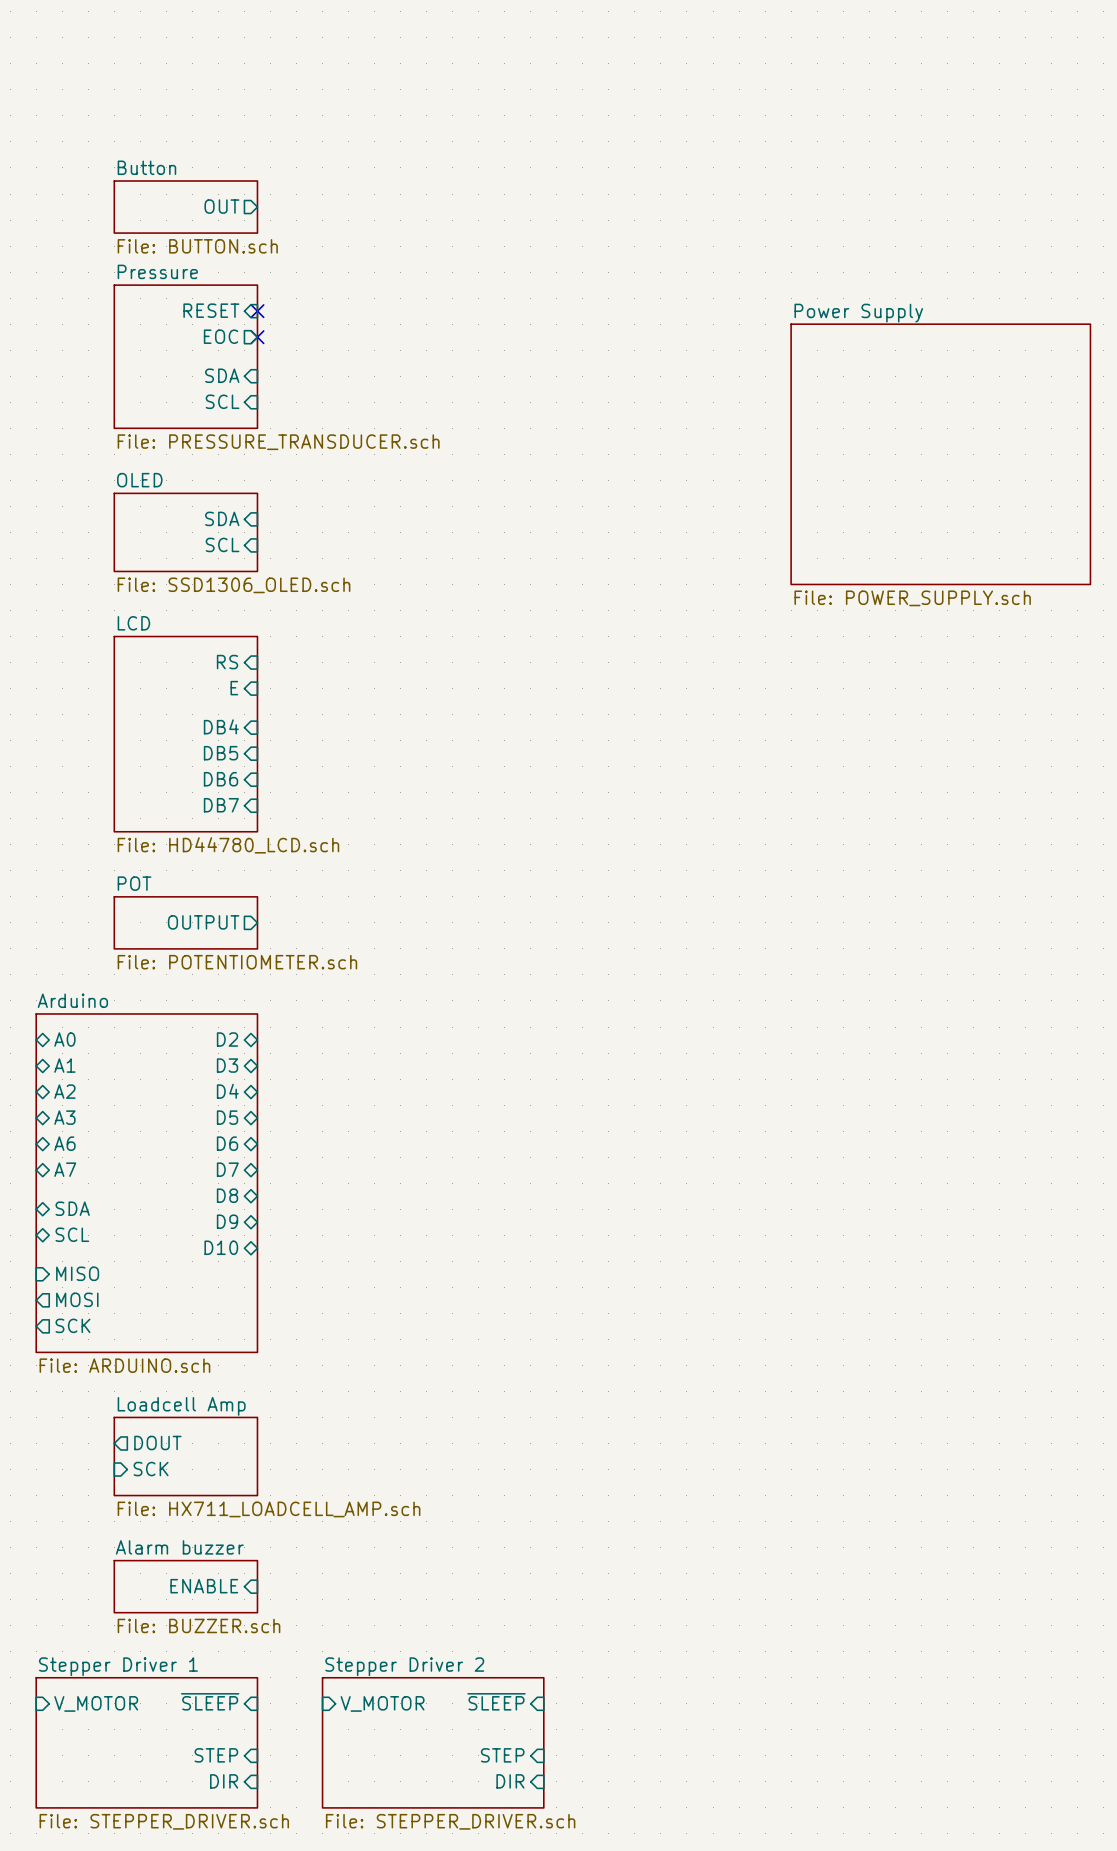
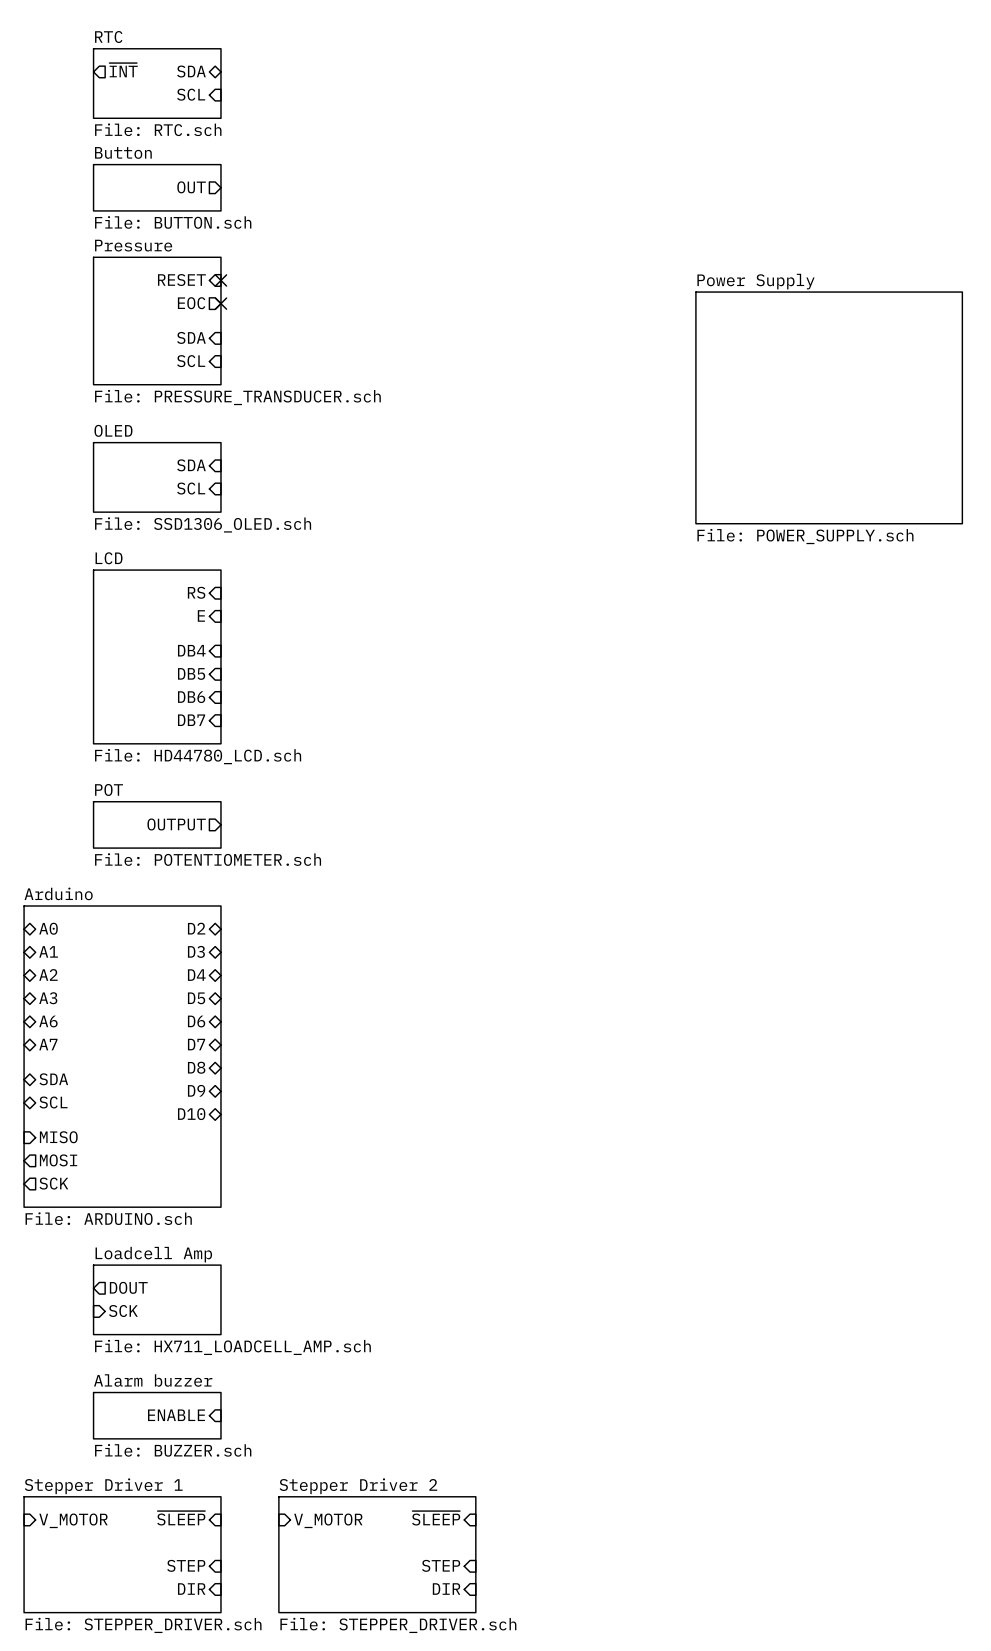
sheet pin: none -> ~{INT} (123, 70)
sheet pin: none -> SDA (191, 71)
sheet RTC: none -> File: RTC.sch (157, 83)
sheet pin: none -> SCL (191, 94)

